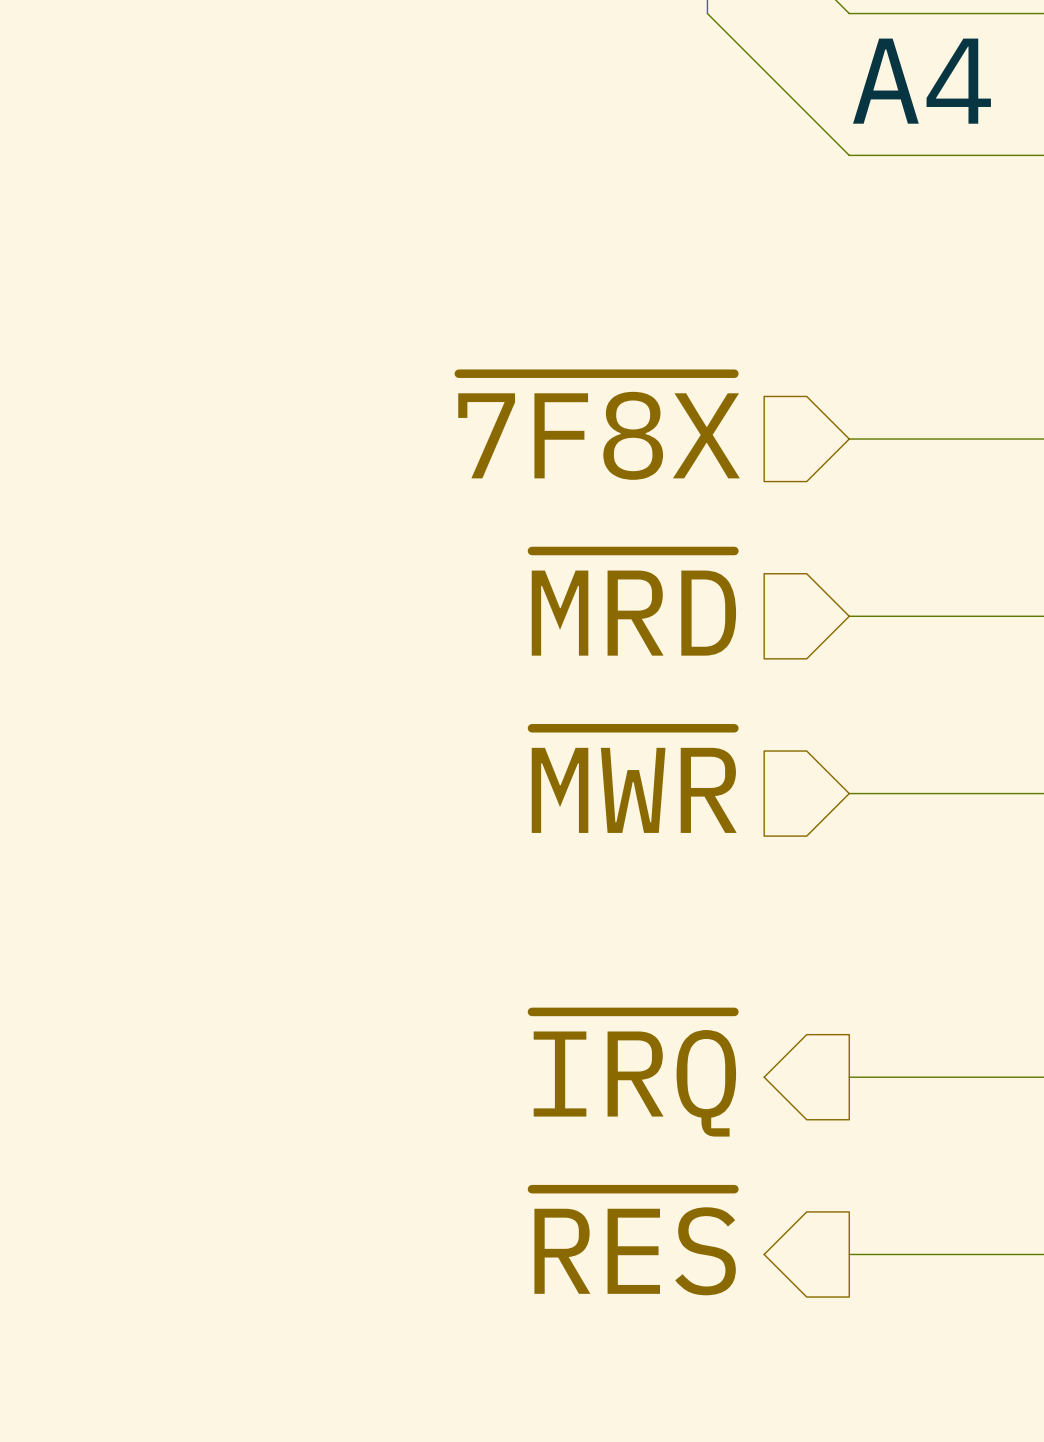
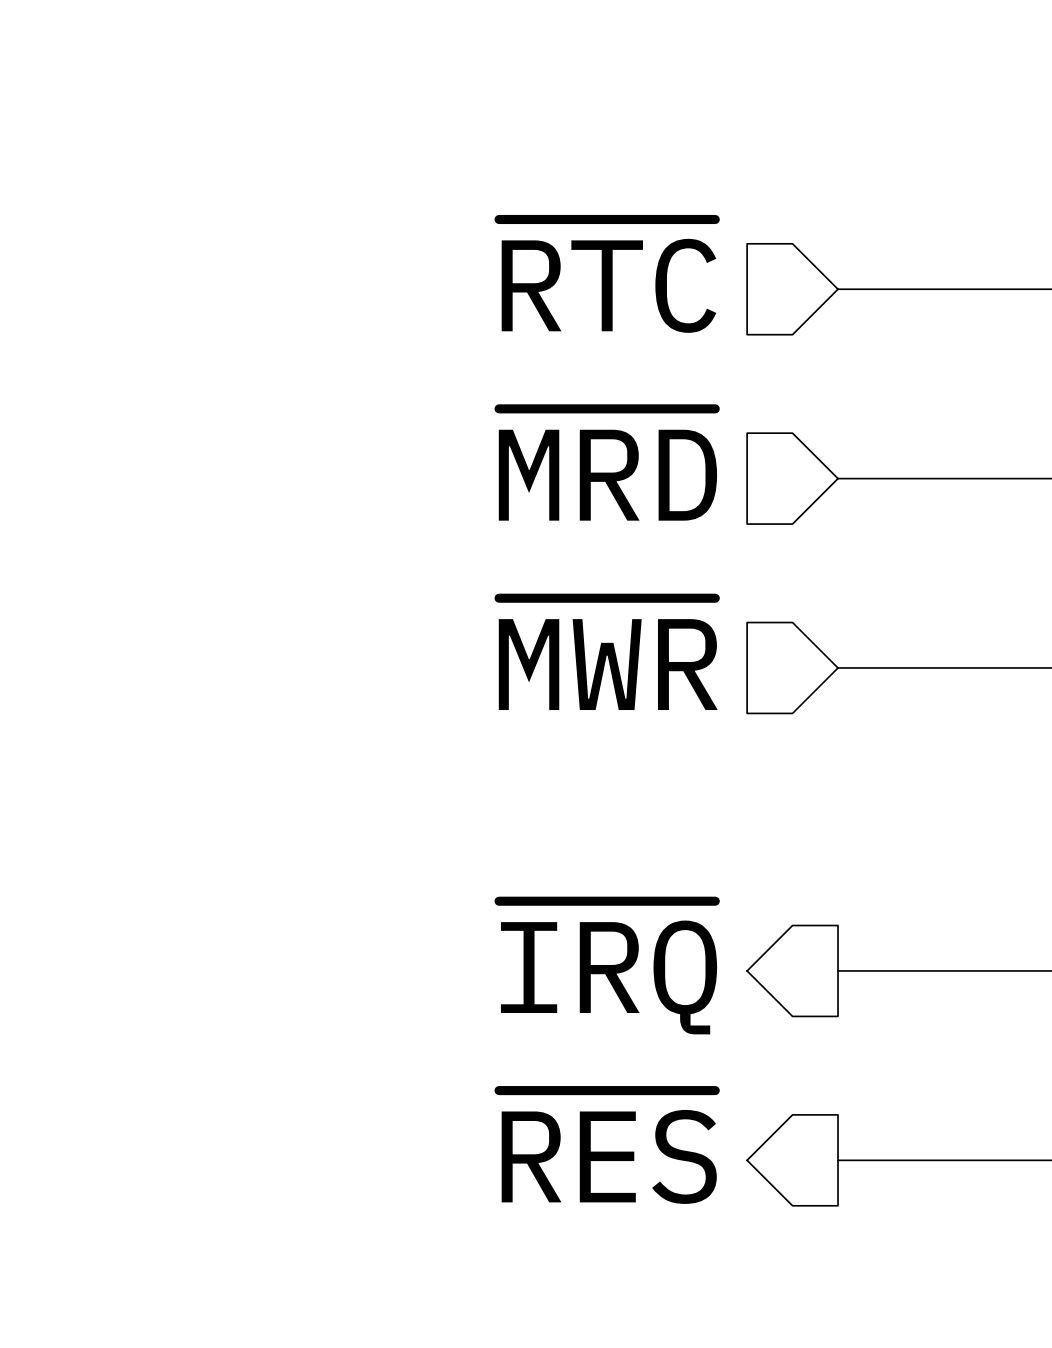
hierarchical label: ~{7F8X} (599, 426) -> ~{RTC} (607, 276)

